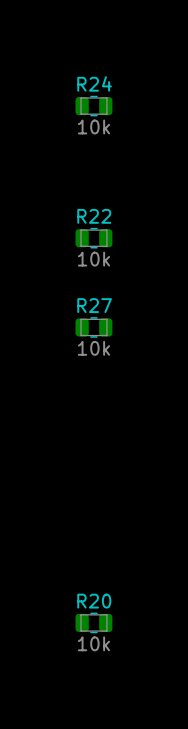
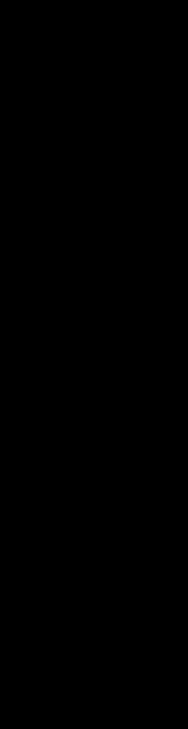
R24: 10k (93, 106) -> none
R22: 10k (93, 238) -> none
R27: 10k (93, 327) -> none
R20: 10k (93, 622) -> none

